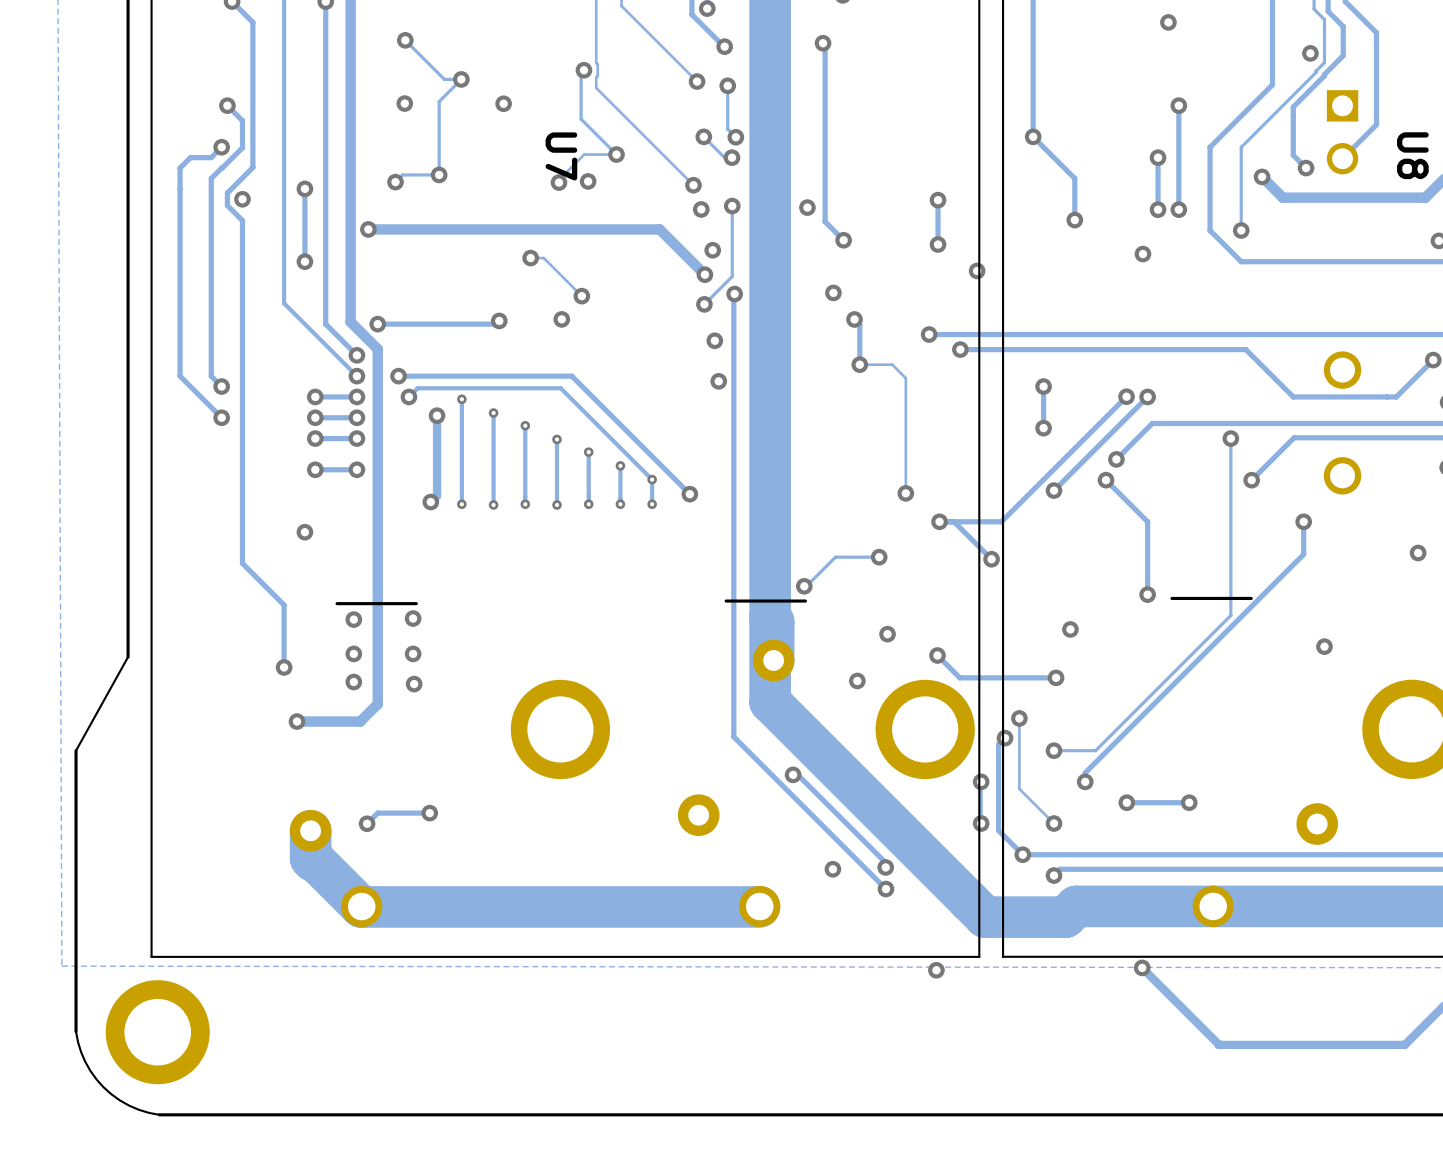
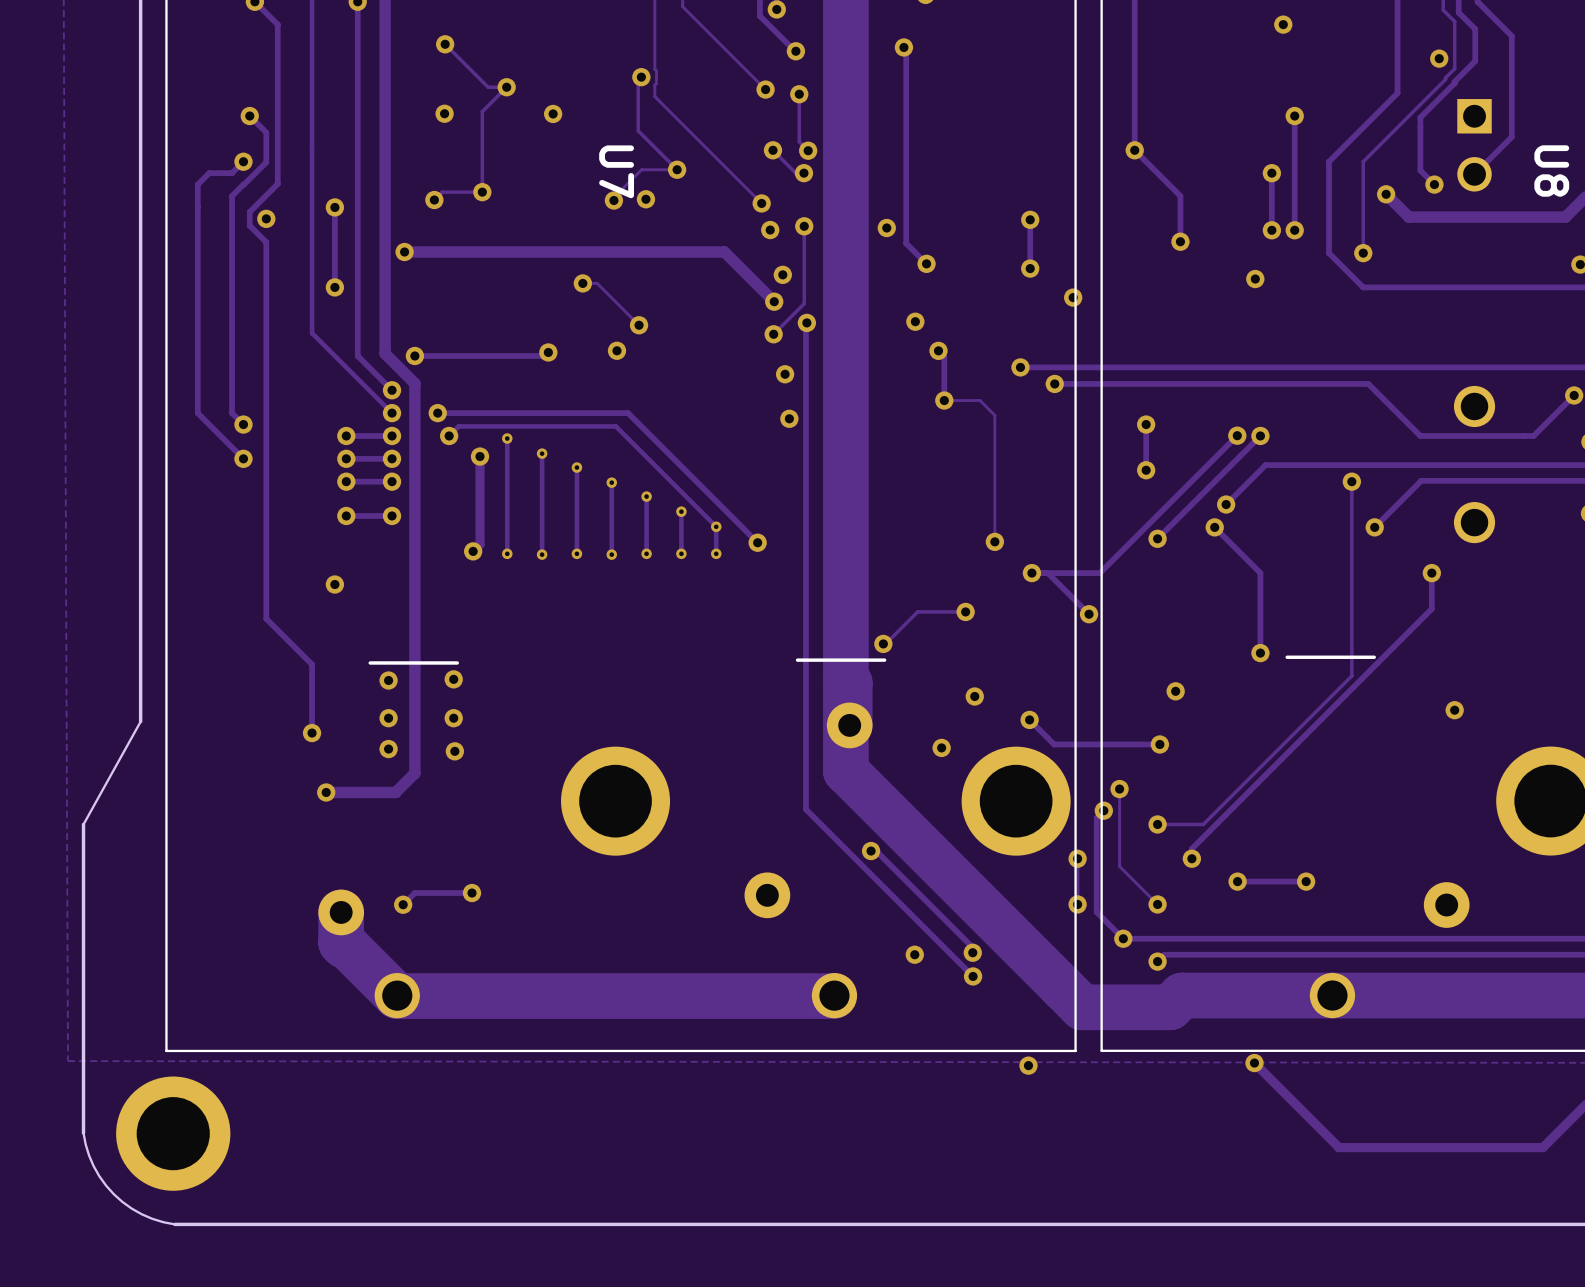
via: (1418, 553) -> none

